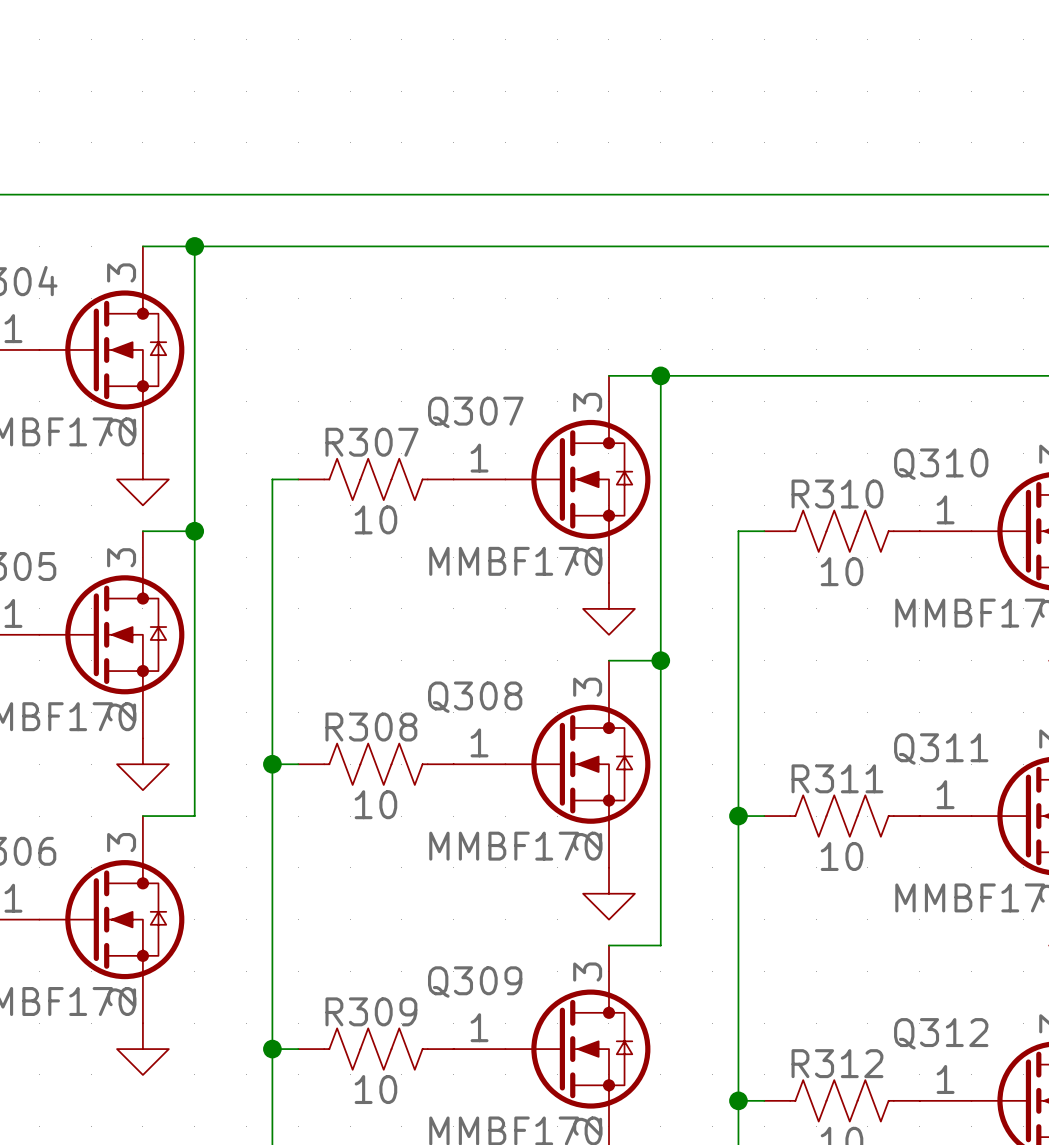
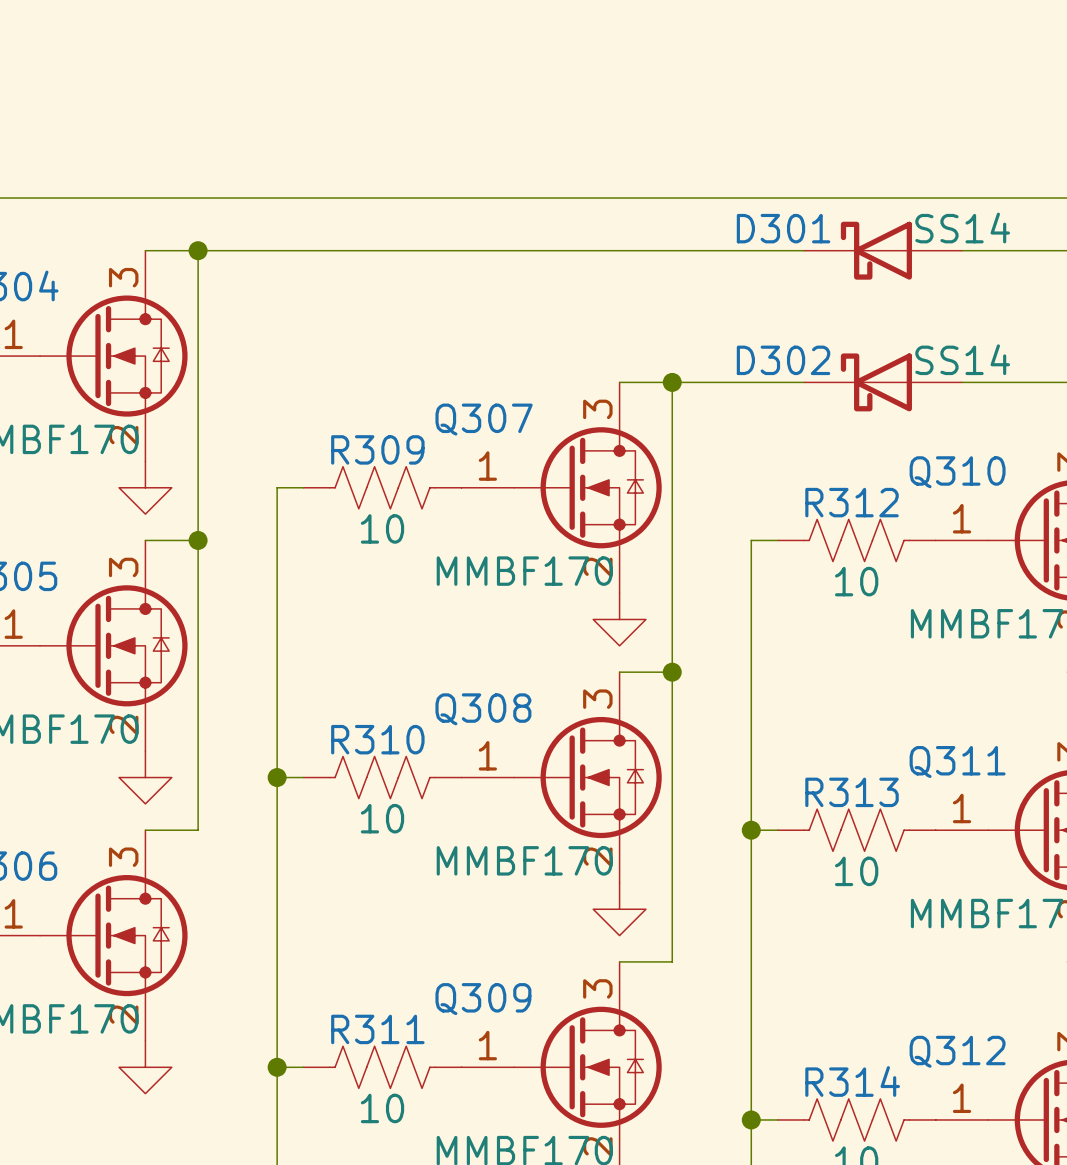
D301: none -> SS14 (883, 250)
D302: none -> SS14 (883, 382)
R307 name: R307 (372, 442) -> R309 (377, 449)
R310 name: R310 (837, 494) -> R312 (852, 502)
R308 name: R308 (371, 727) -> R310 (377, 739)
R311 name: R311 (837, 778) -> R313 (852, 792)
R309 name: R309 (371, 1011) -> R311 (377, 1029)
R312 name: R312 (837, 1063) -> R314 (852, 1081)

